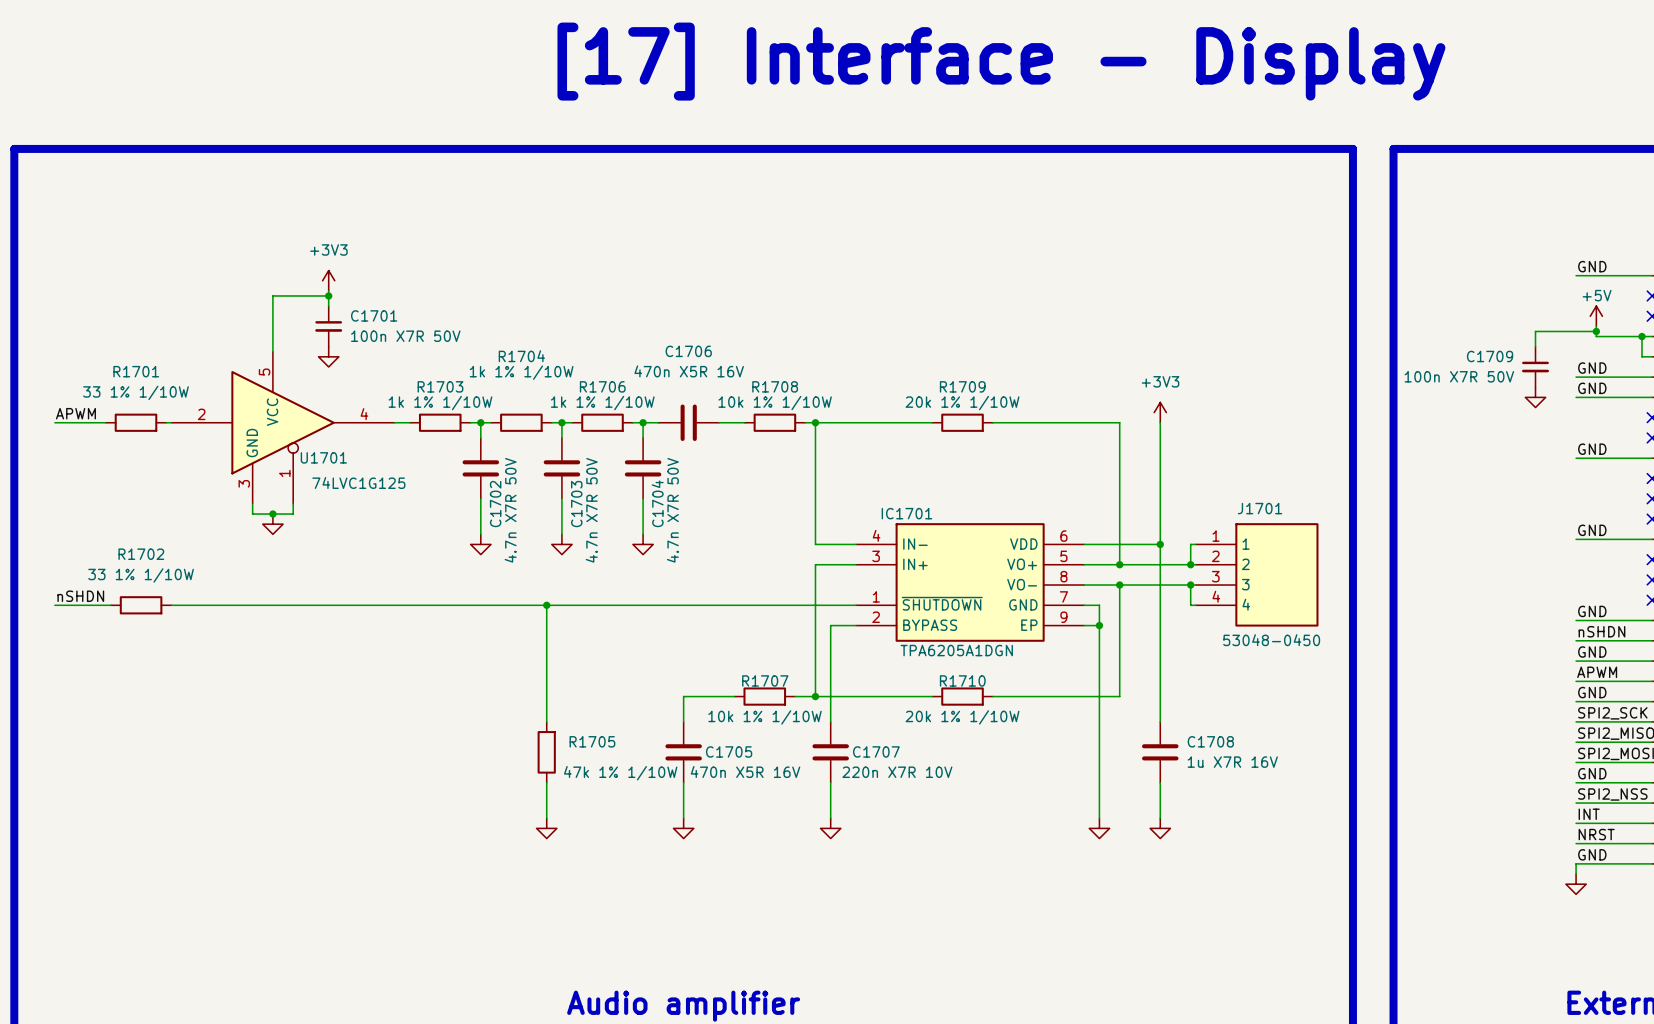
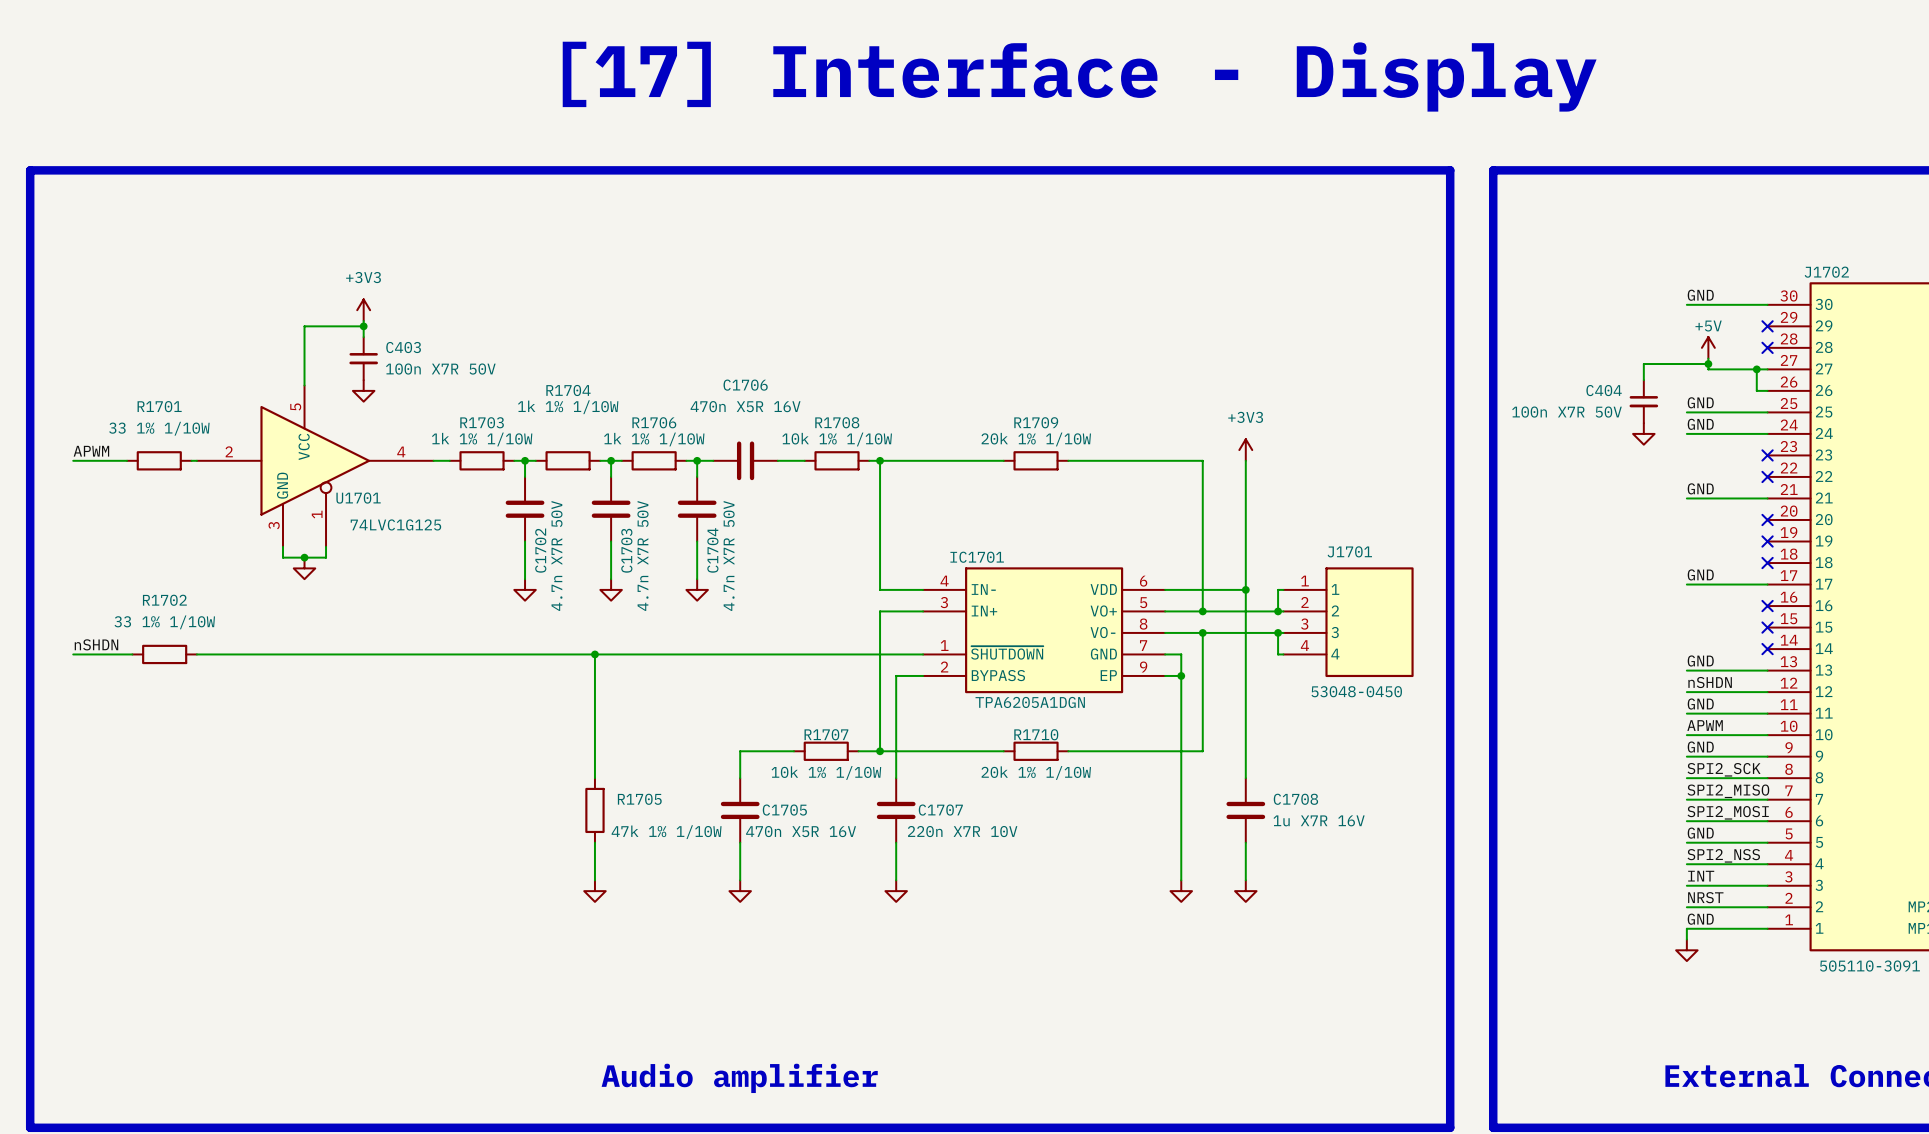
C1701 name: C1701 (374, 315) -> C403 (403, 347)
C1709 name: C1709 (1490, 356) -> C404 (1604, 390)

